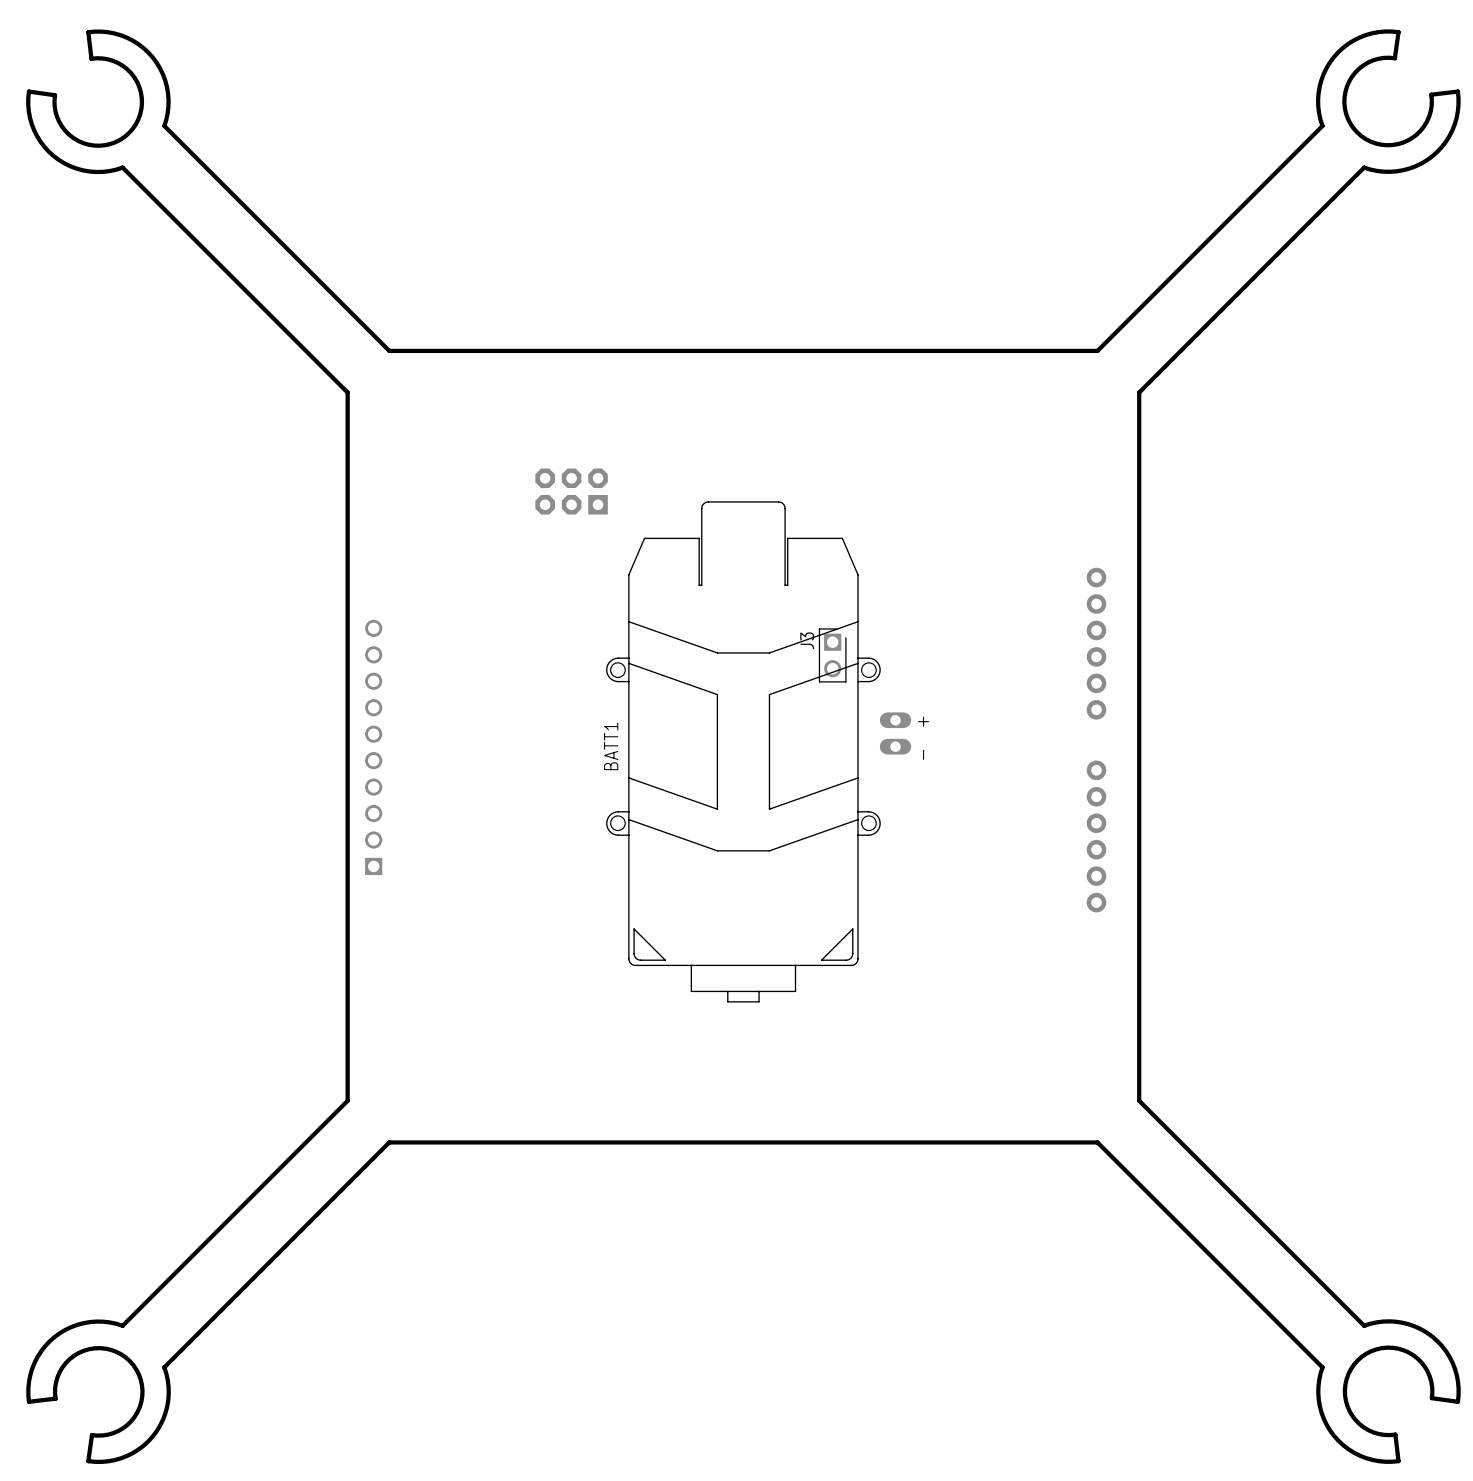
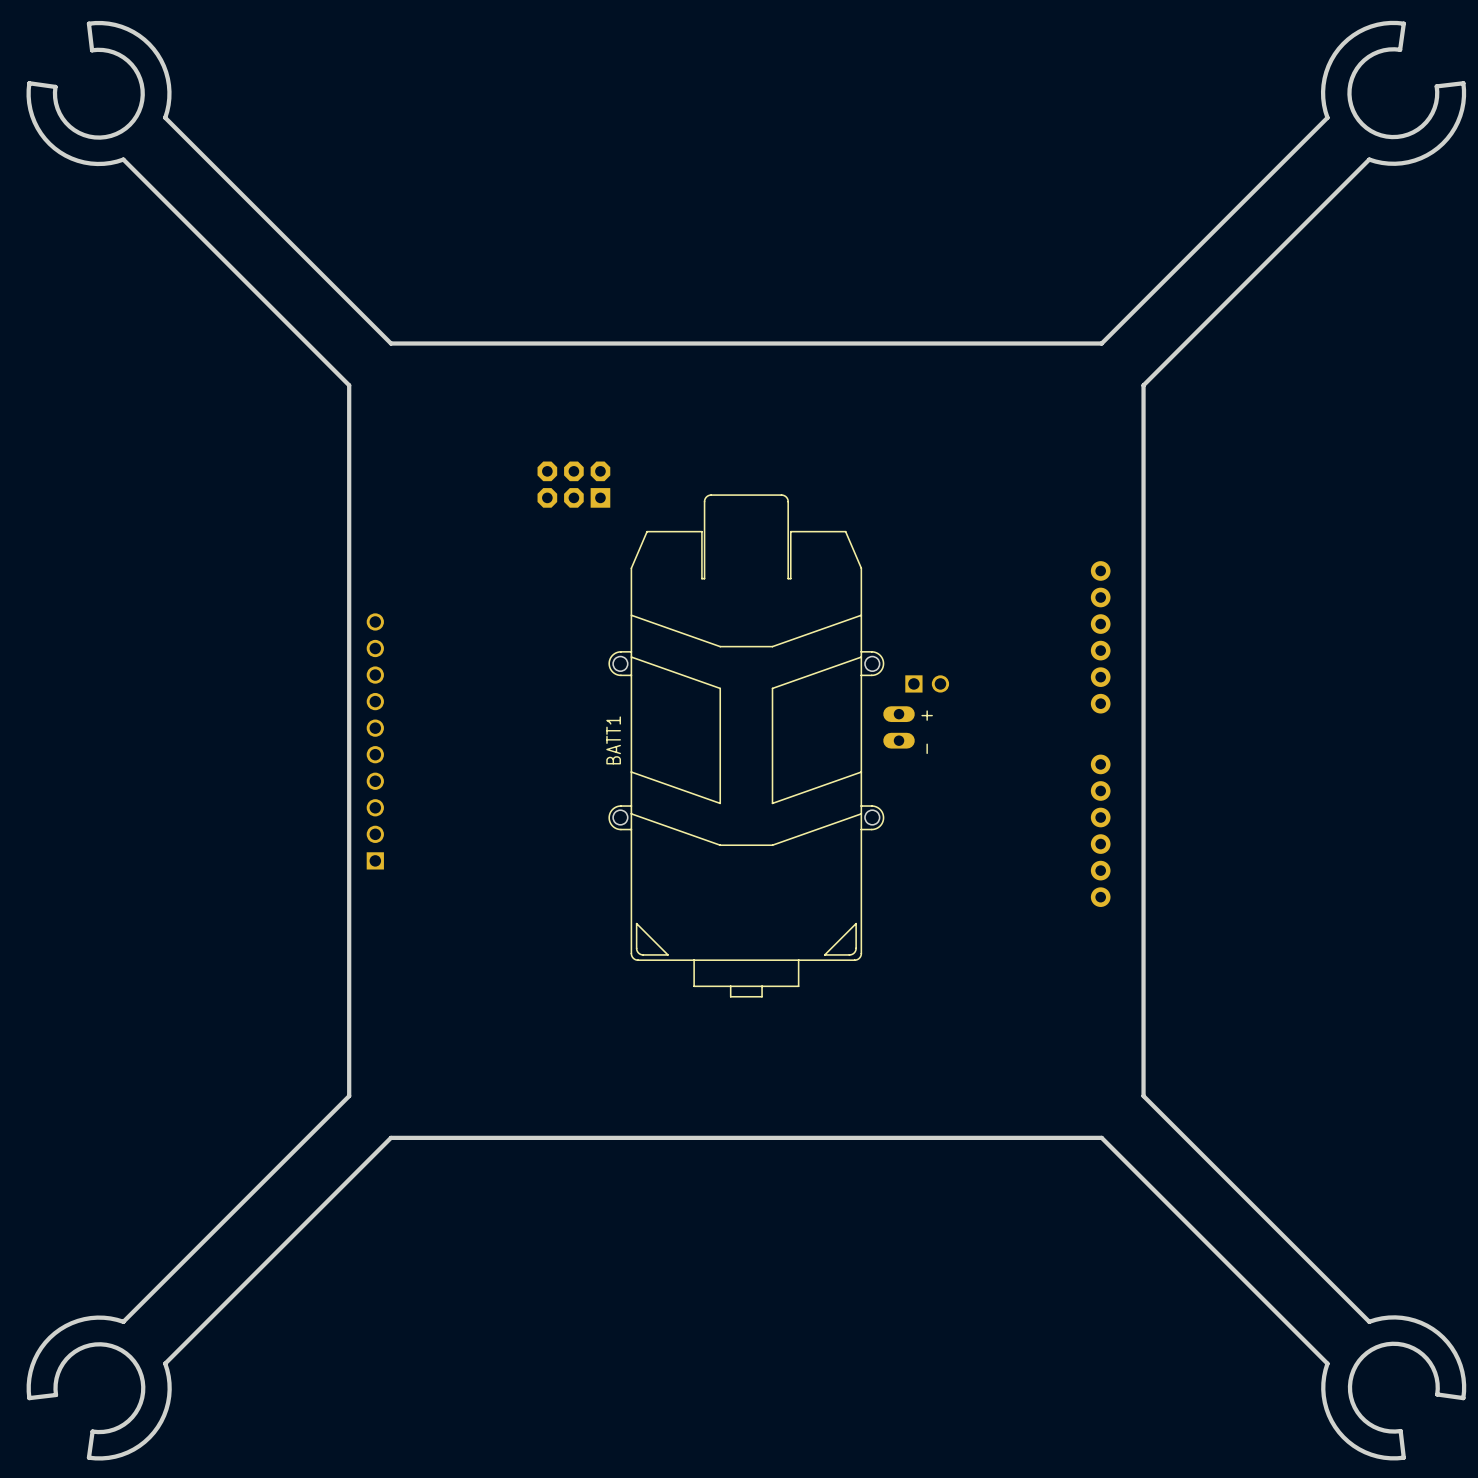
J3 side: bottom (832, 655) -> top (927, 683)

